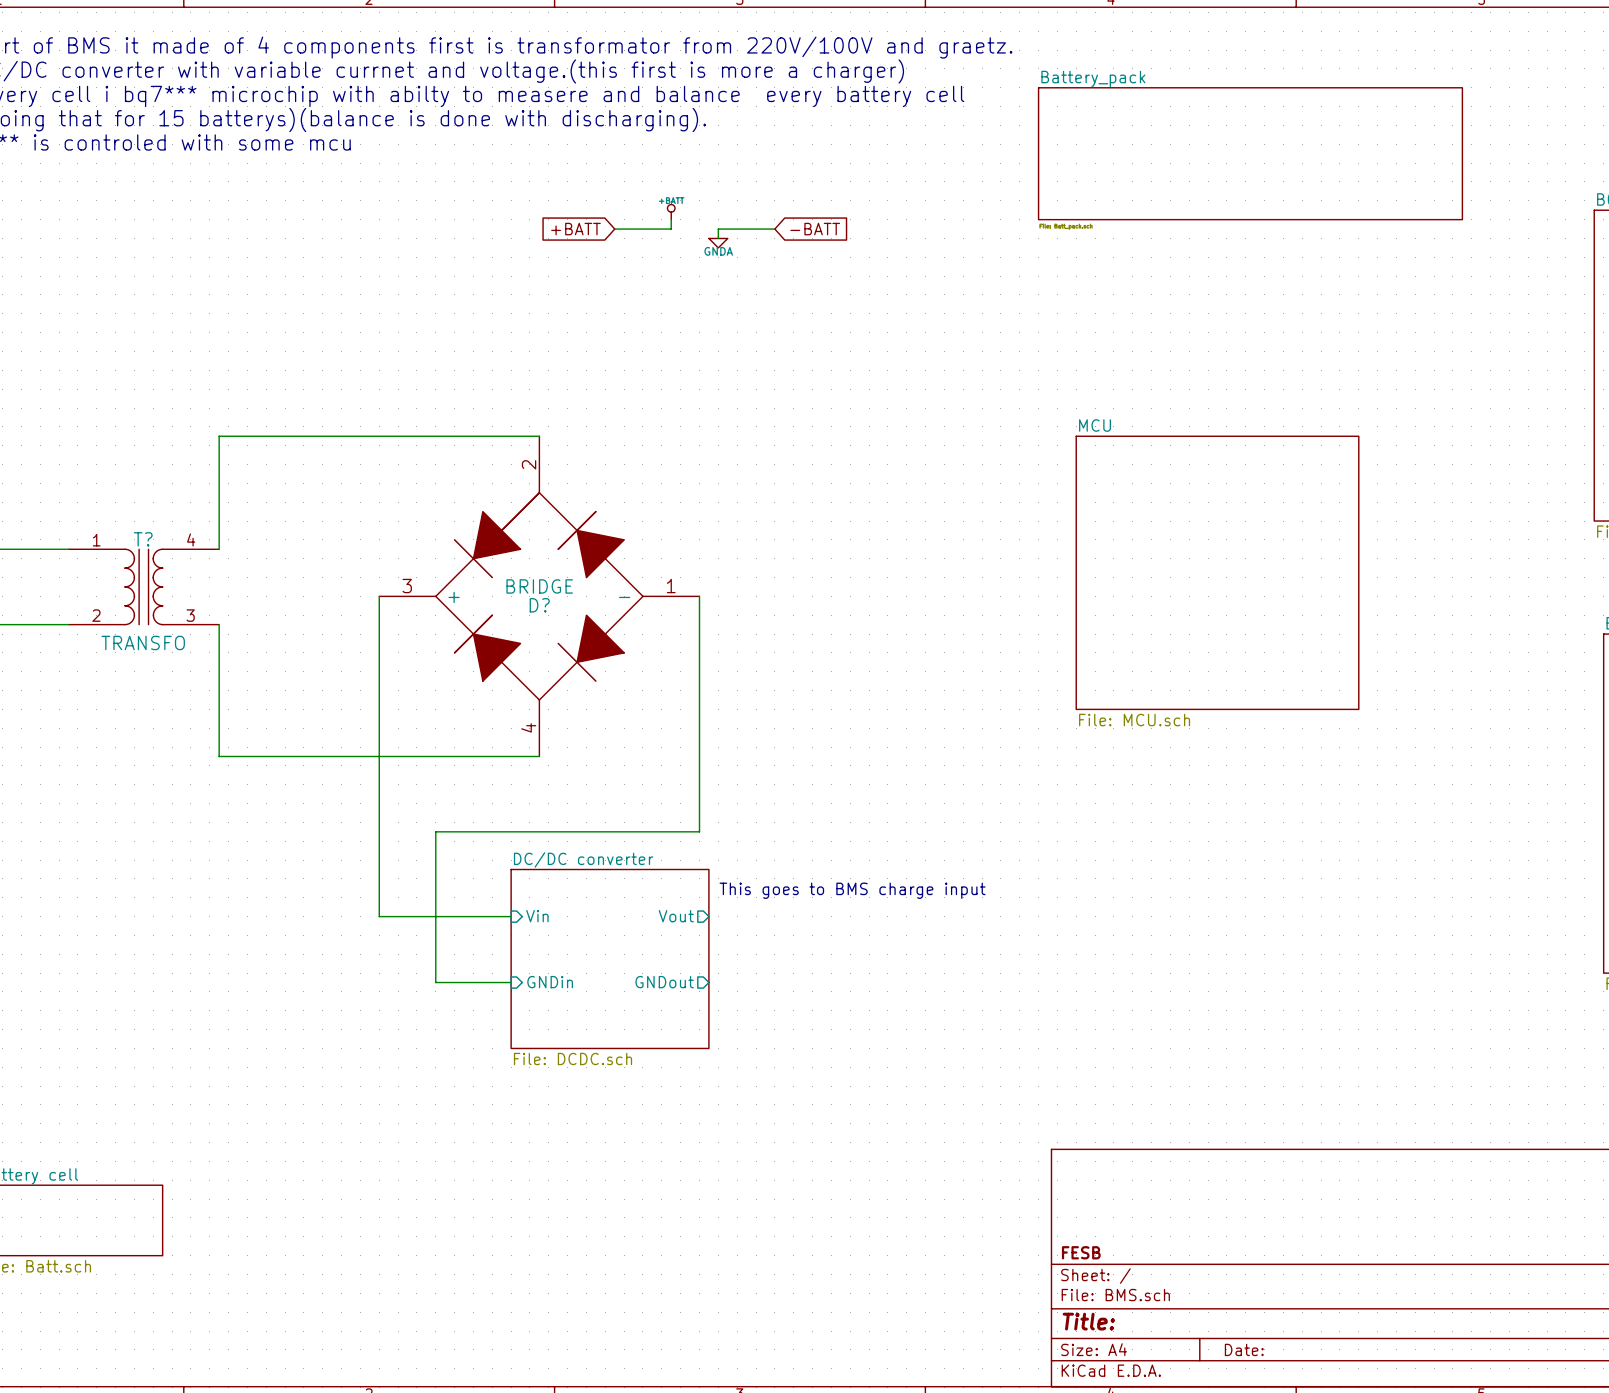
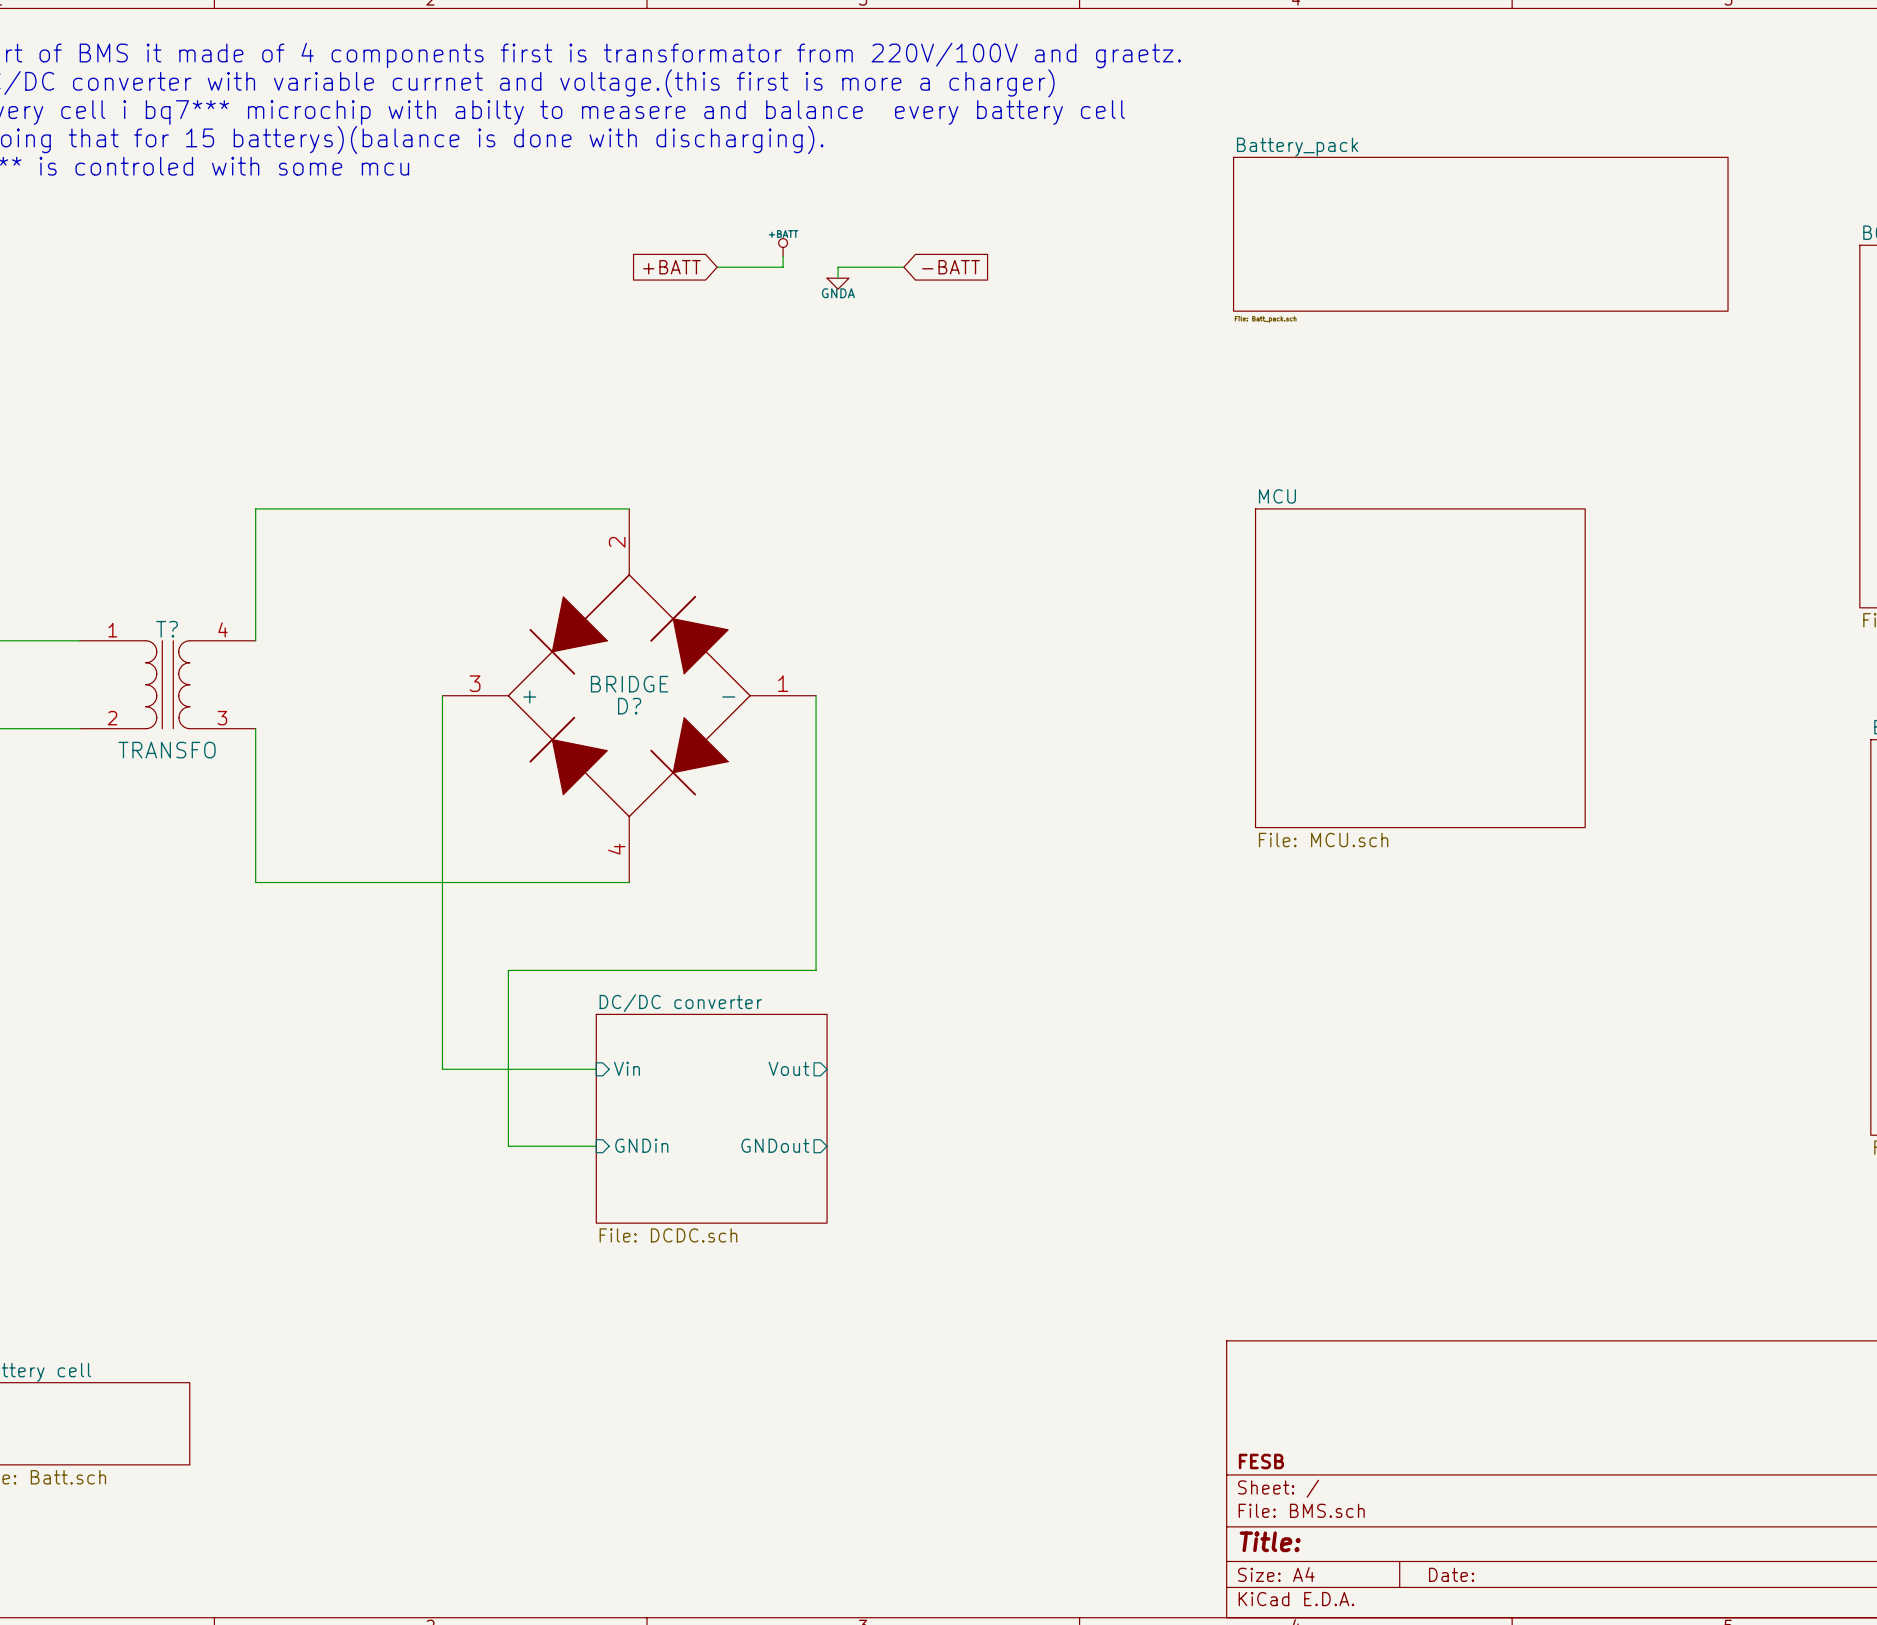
sheet Battery_pack position: (1250, 153) -> (1480, 234)
text: This goes to BMS charge input (852, 890) -> none

